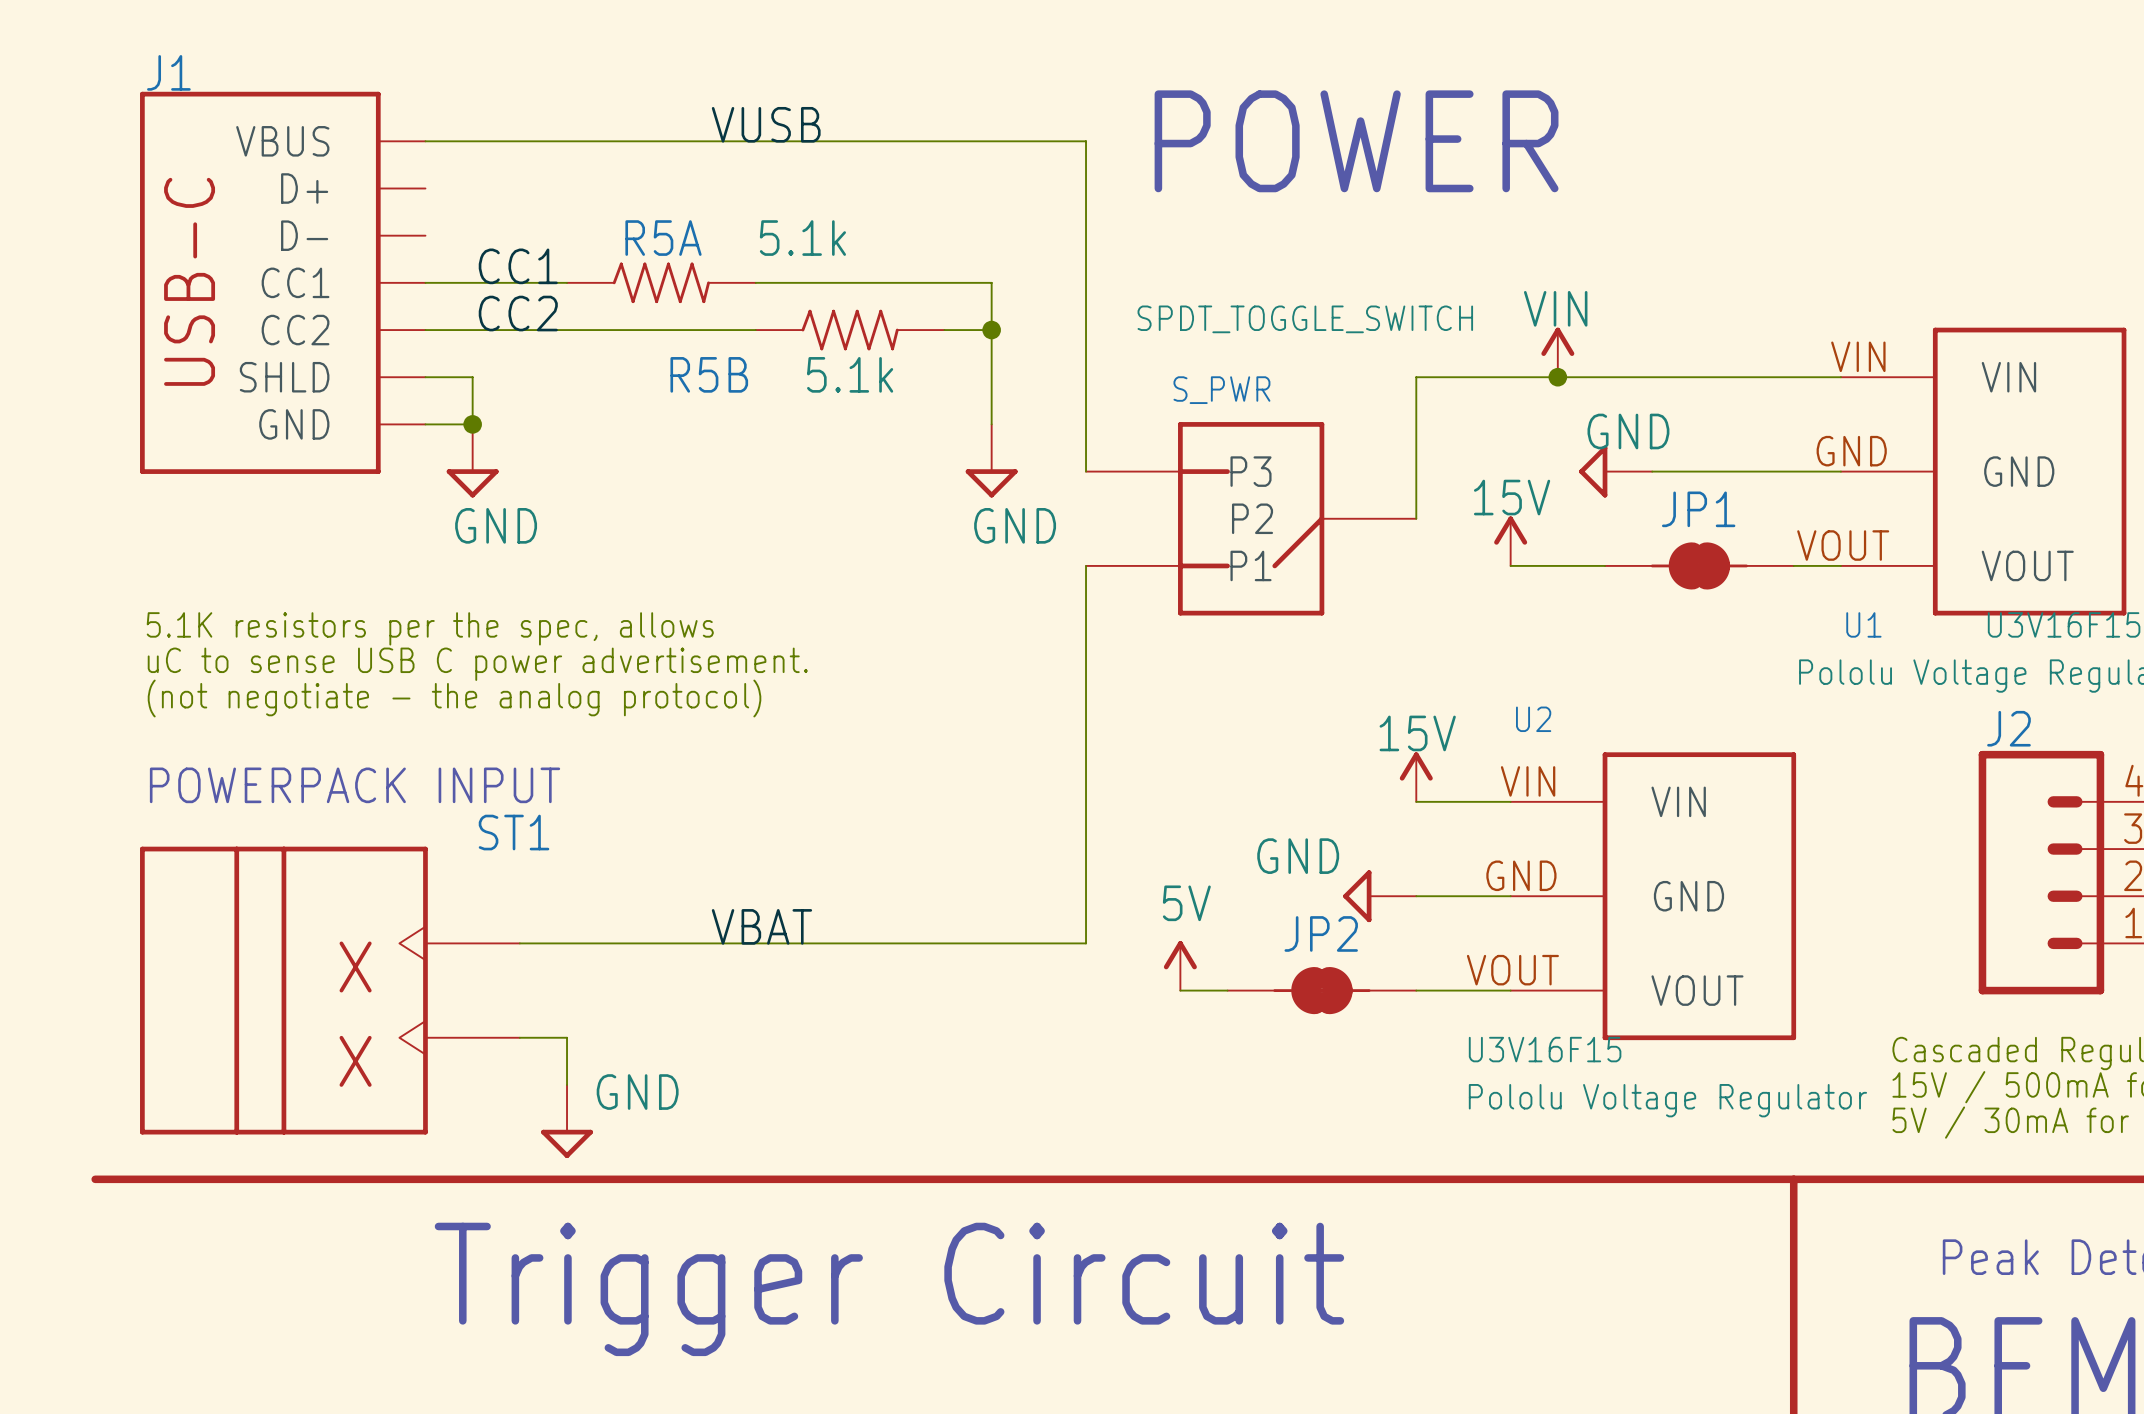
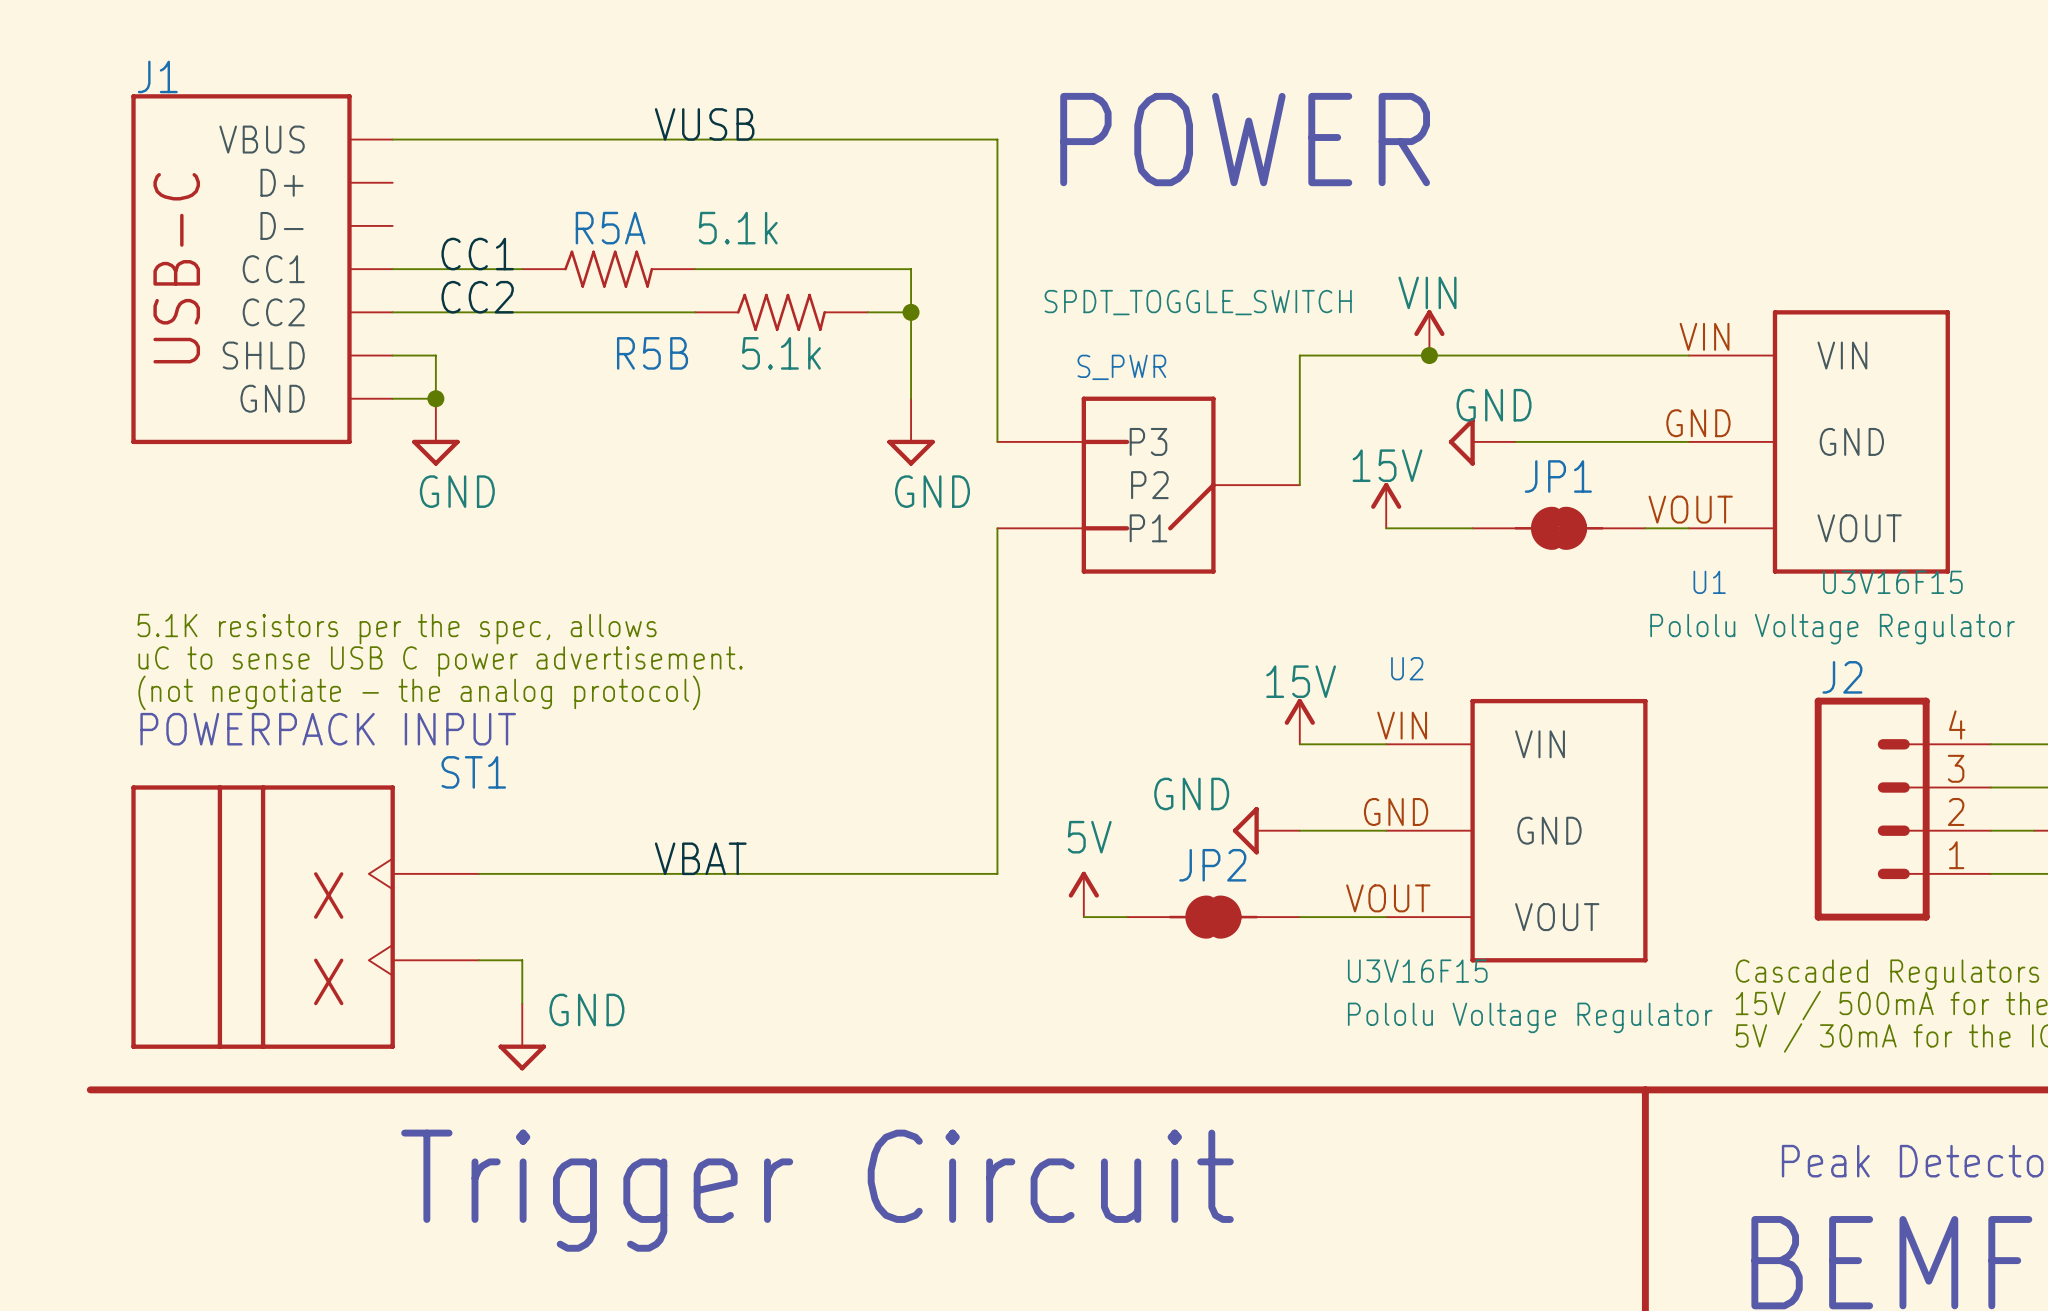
text position: 5.1K resistors per the spec, allows (430, 628) -> 5.1K resistors per the spec, allows (397, 629)
text position: uC to sense USB C power advertisement. (477, 664) -> uC to sense USB C power advertisement. (440, 661)
text position: (not negotiate - the analog protocol) (454, 698) -> (not negotiate - the analog protocol) (419, 692)

